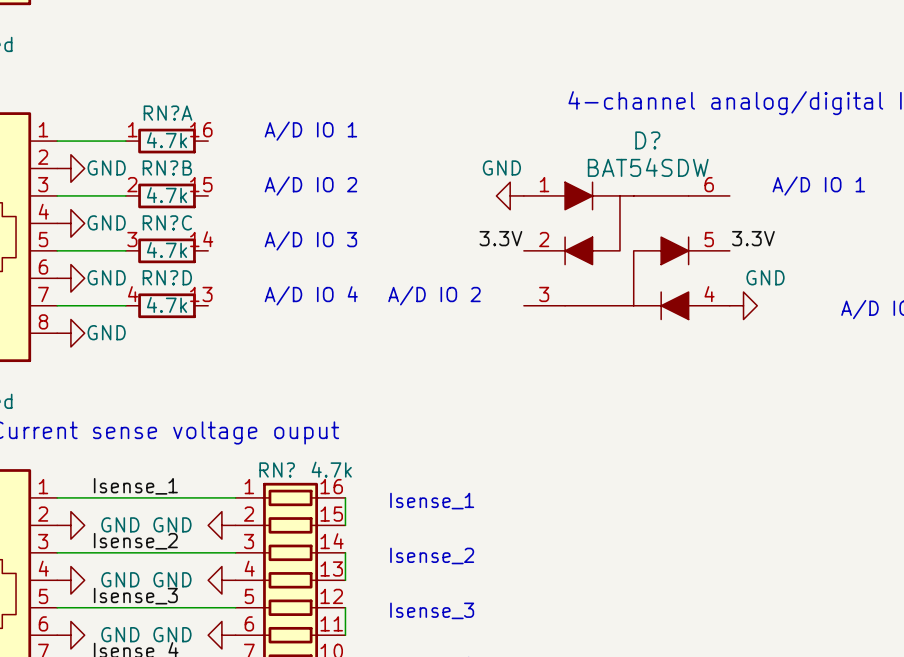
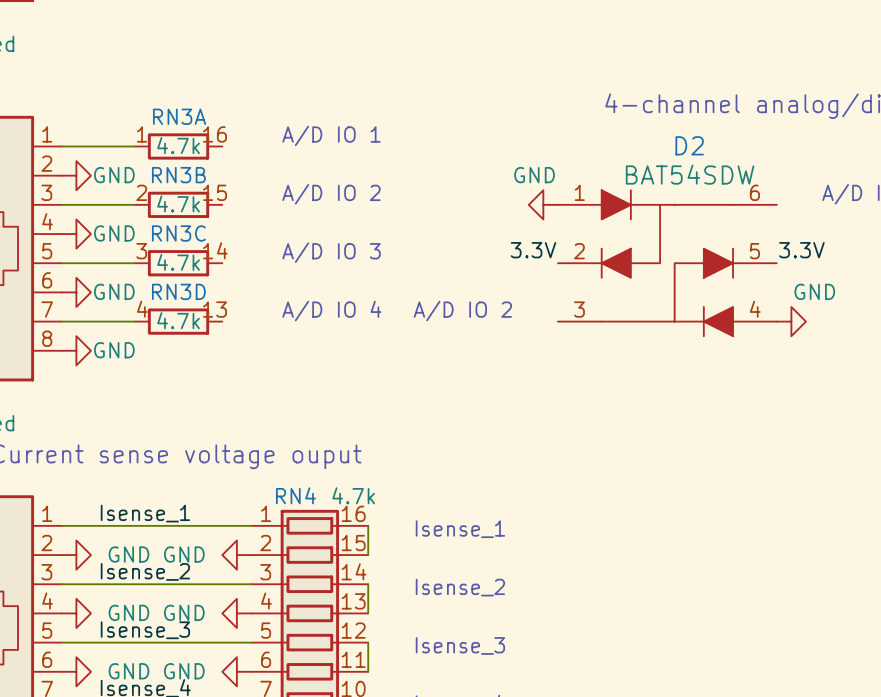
RN?A name: RN?A (167, 113) -> RN3A (179, 116)
D? name: D? (647, 140) -> D2 (689, 145)
RN?B name: RN?B (167, 167) -> RN3B (178, 175)
RN?C name: RN?C (167, 222) -> RN3C (178, 233)
RN?D name: RN?D (167, 277) -> RN3D (178, 291)
RN? name: RN? (277, 469) -> RN4 (295, 495)

